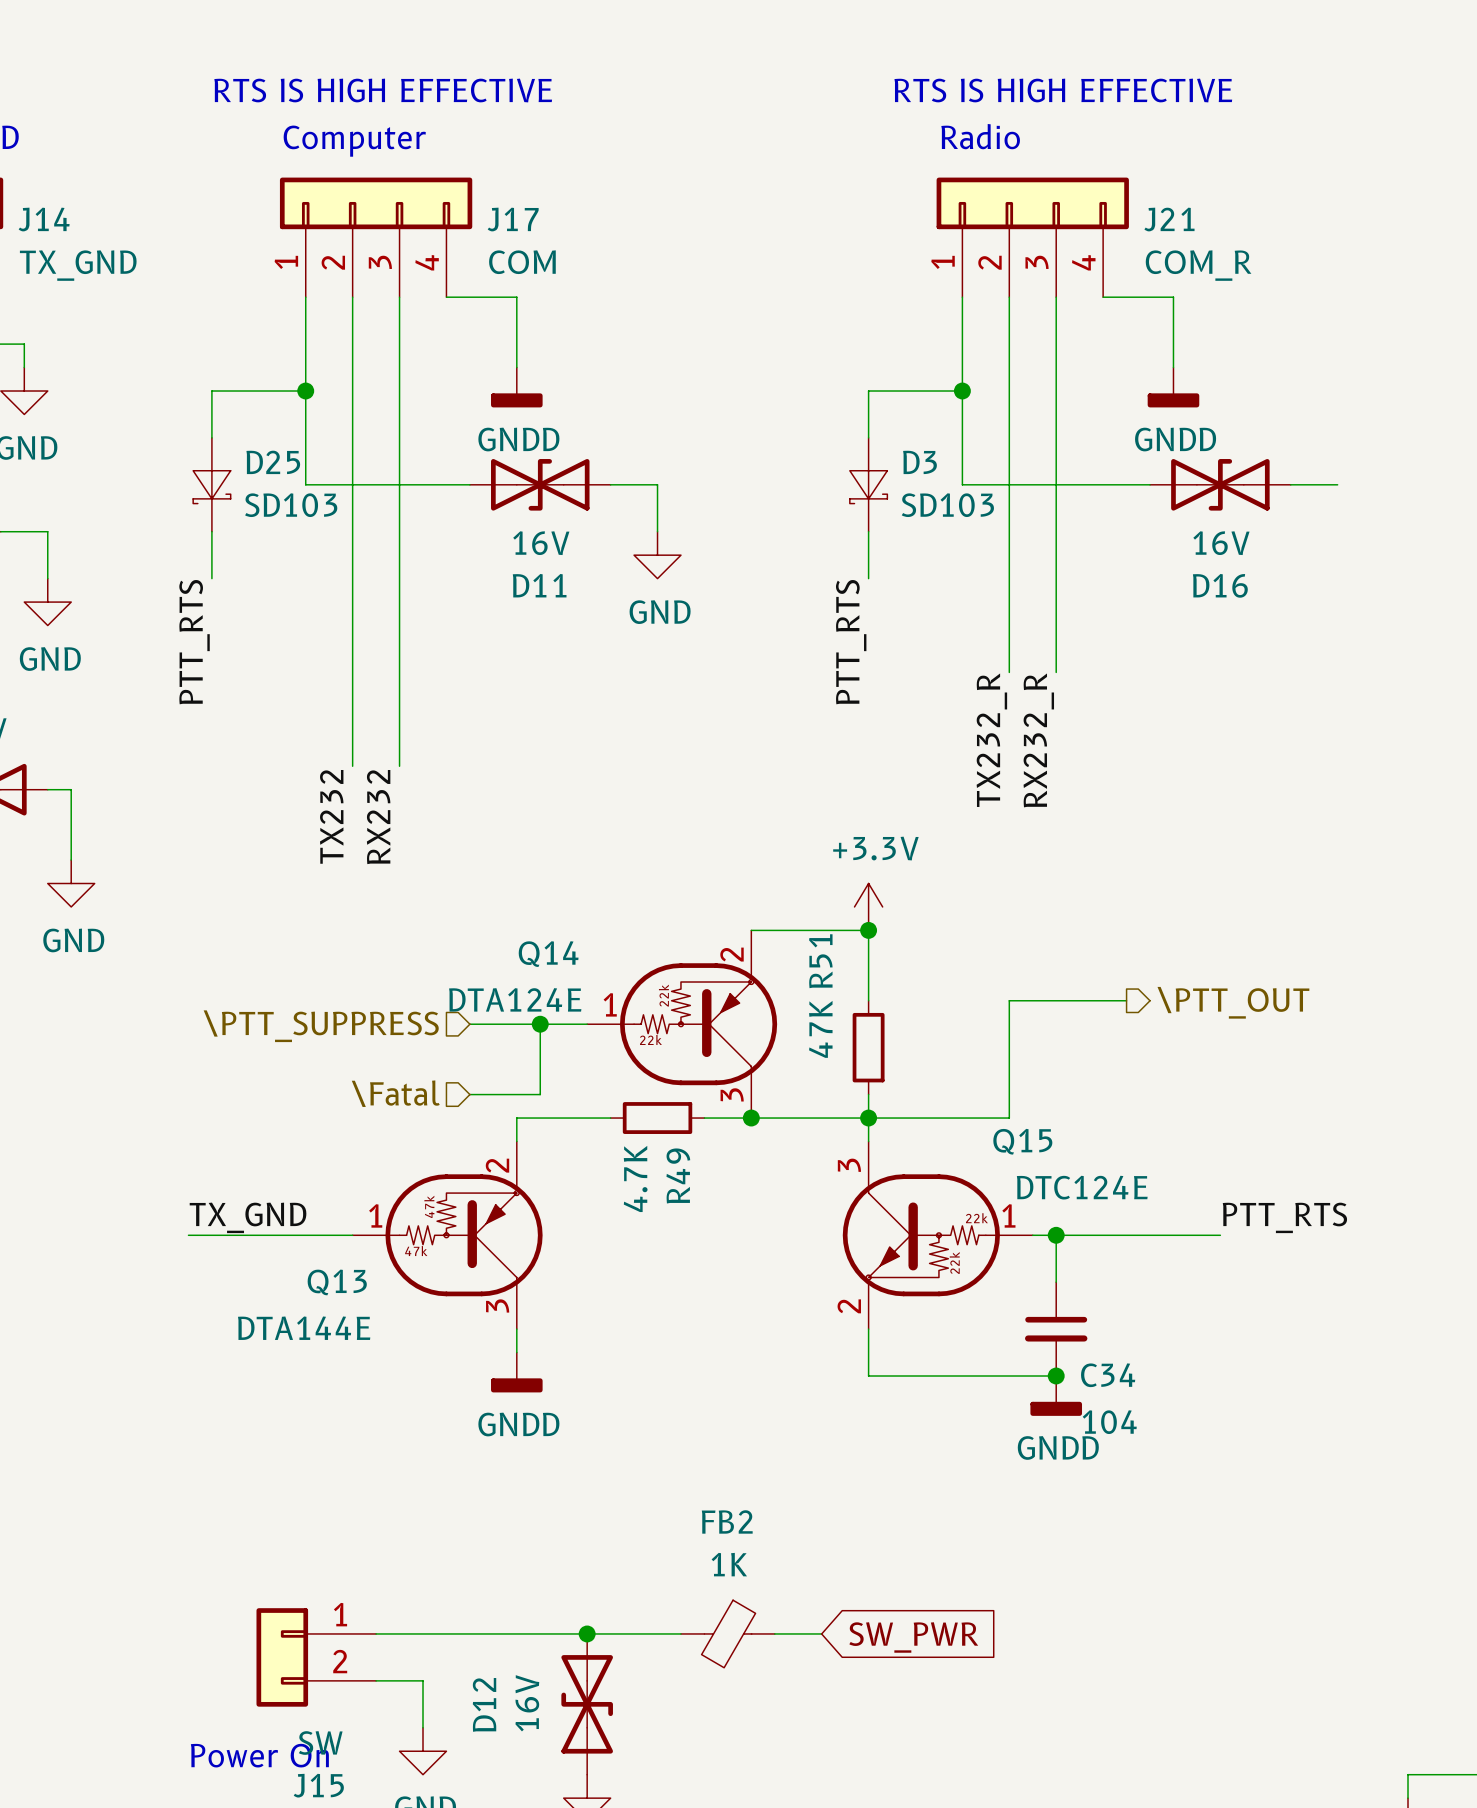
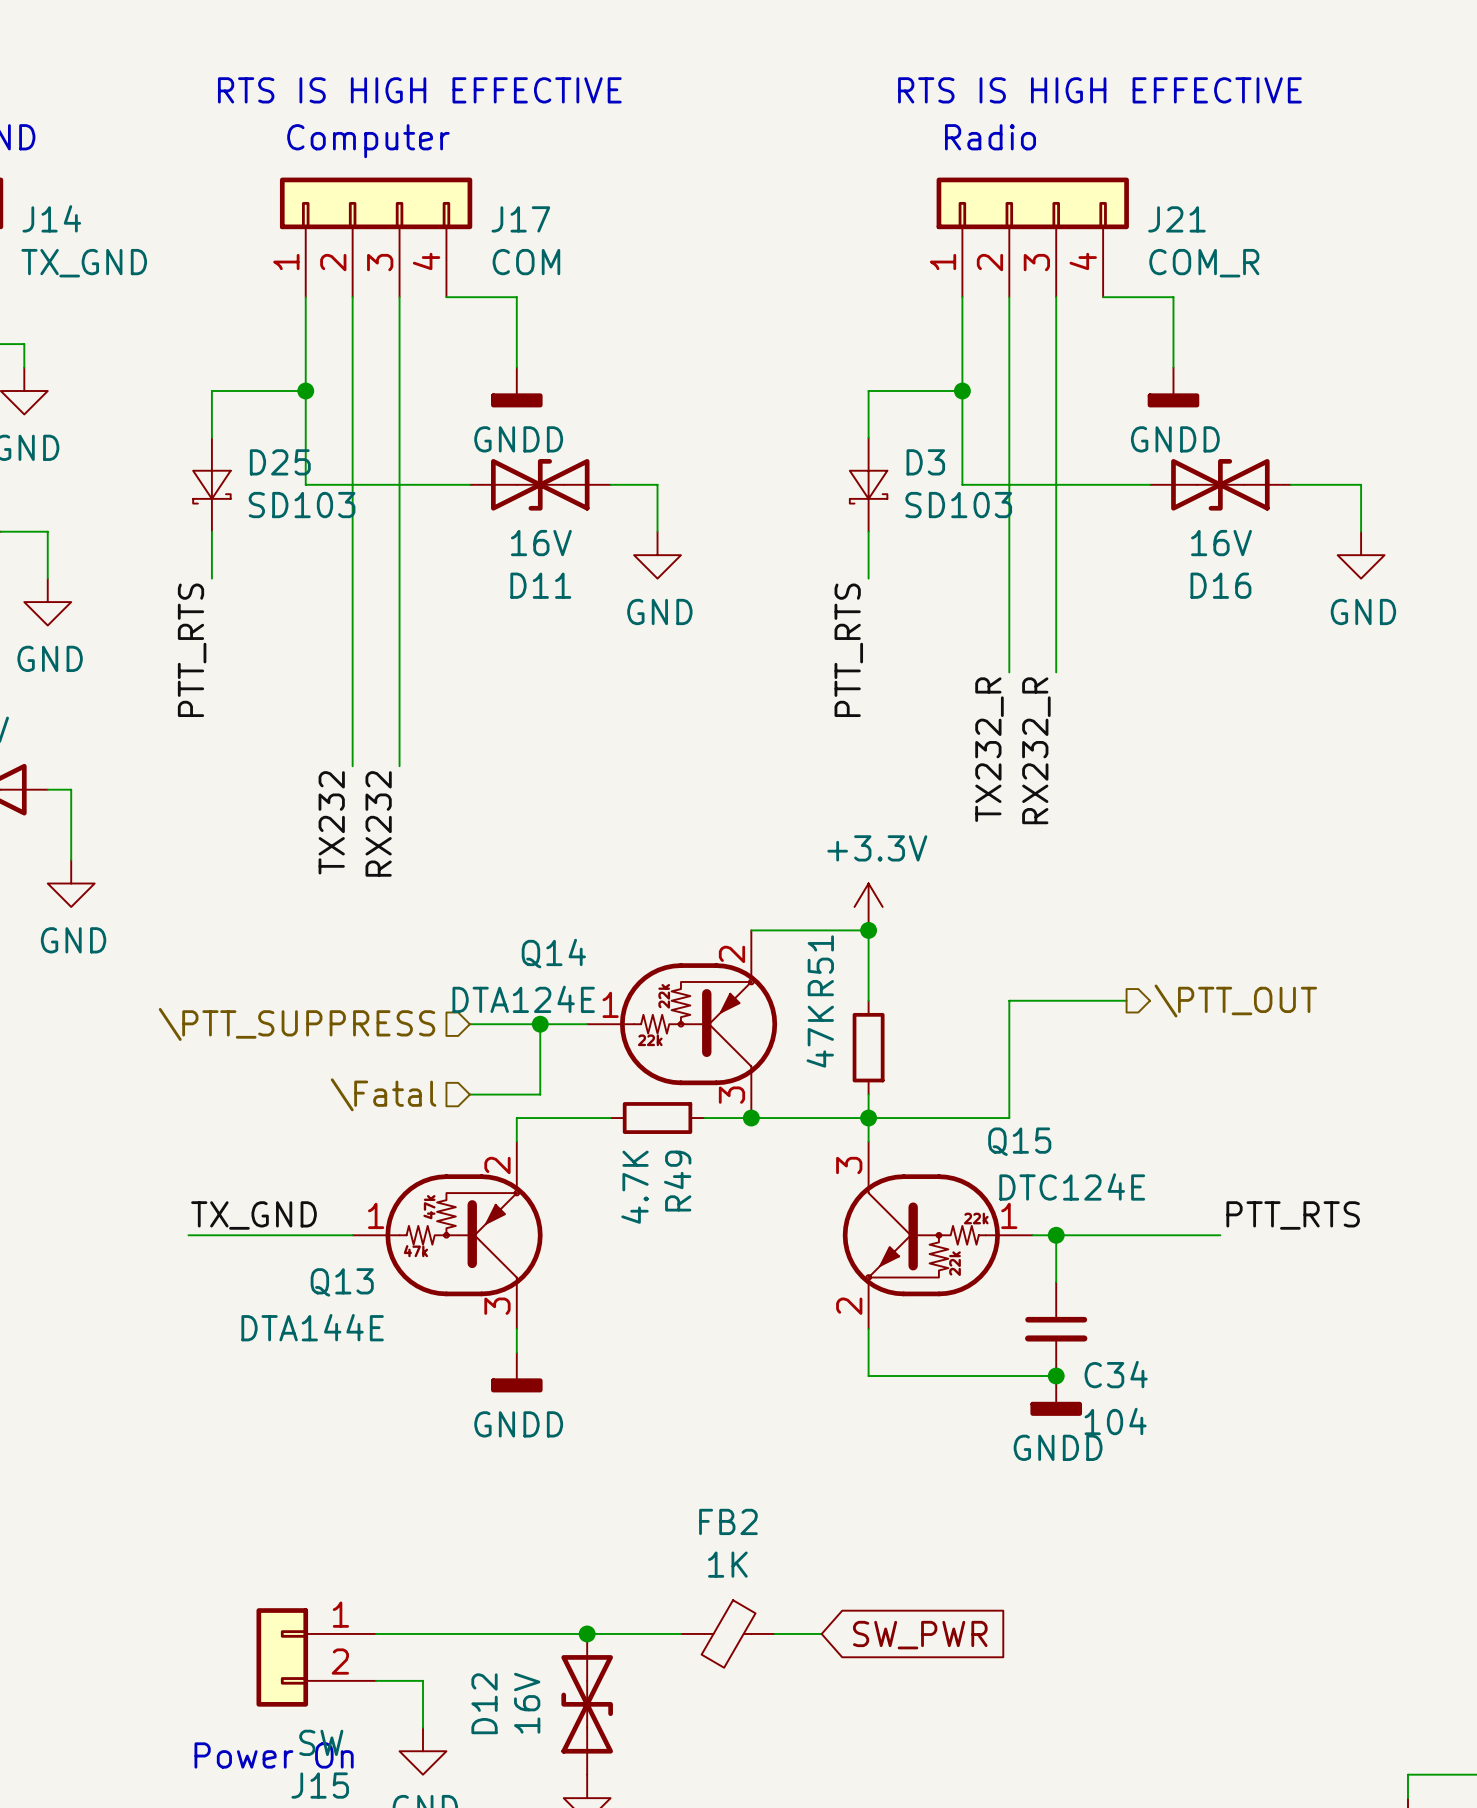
wire: none -> (1337, 484) (1361, 484) (1361, 531)
power symbol: none -> GND (1361, 555)

